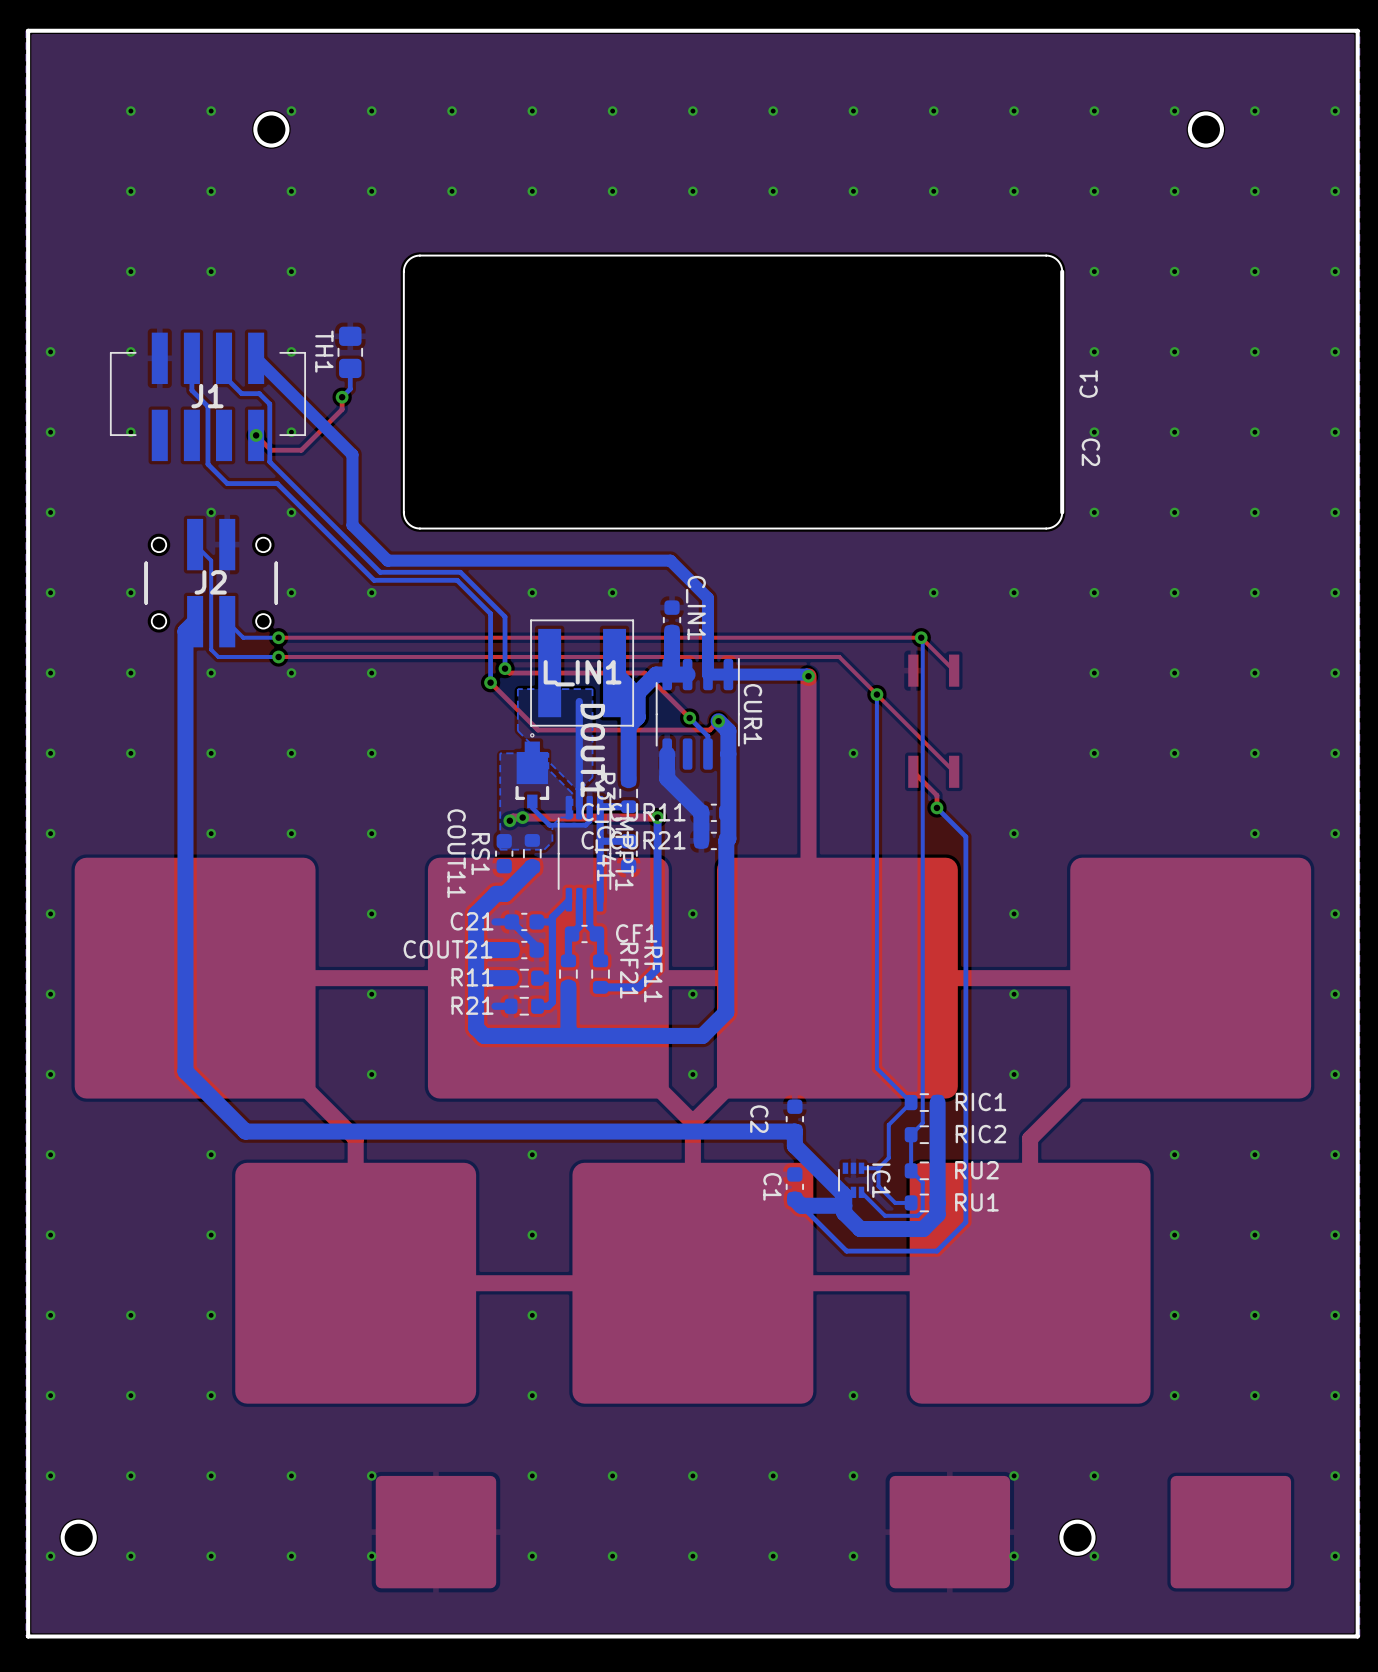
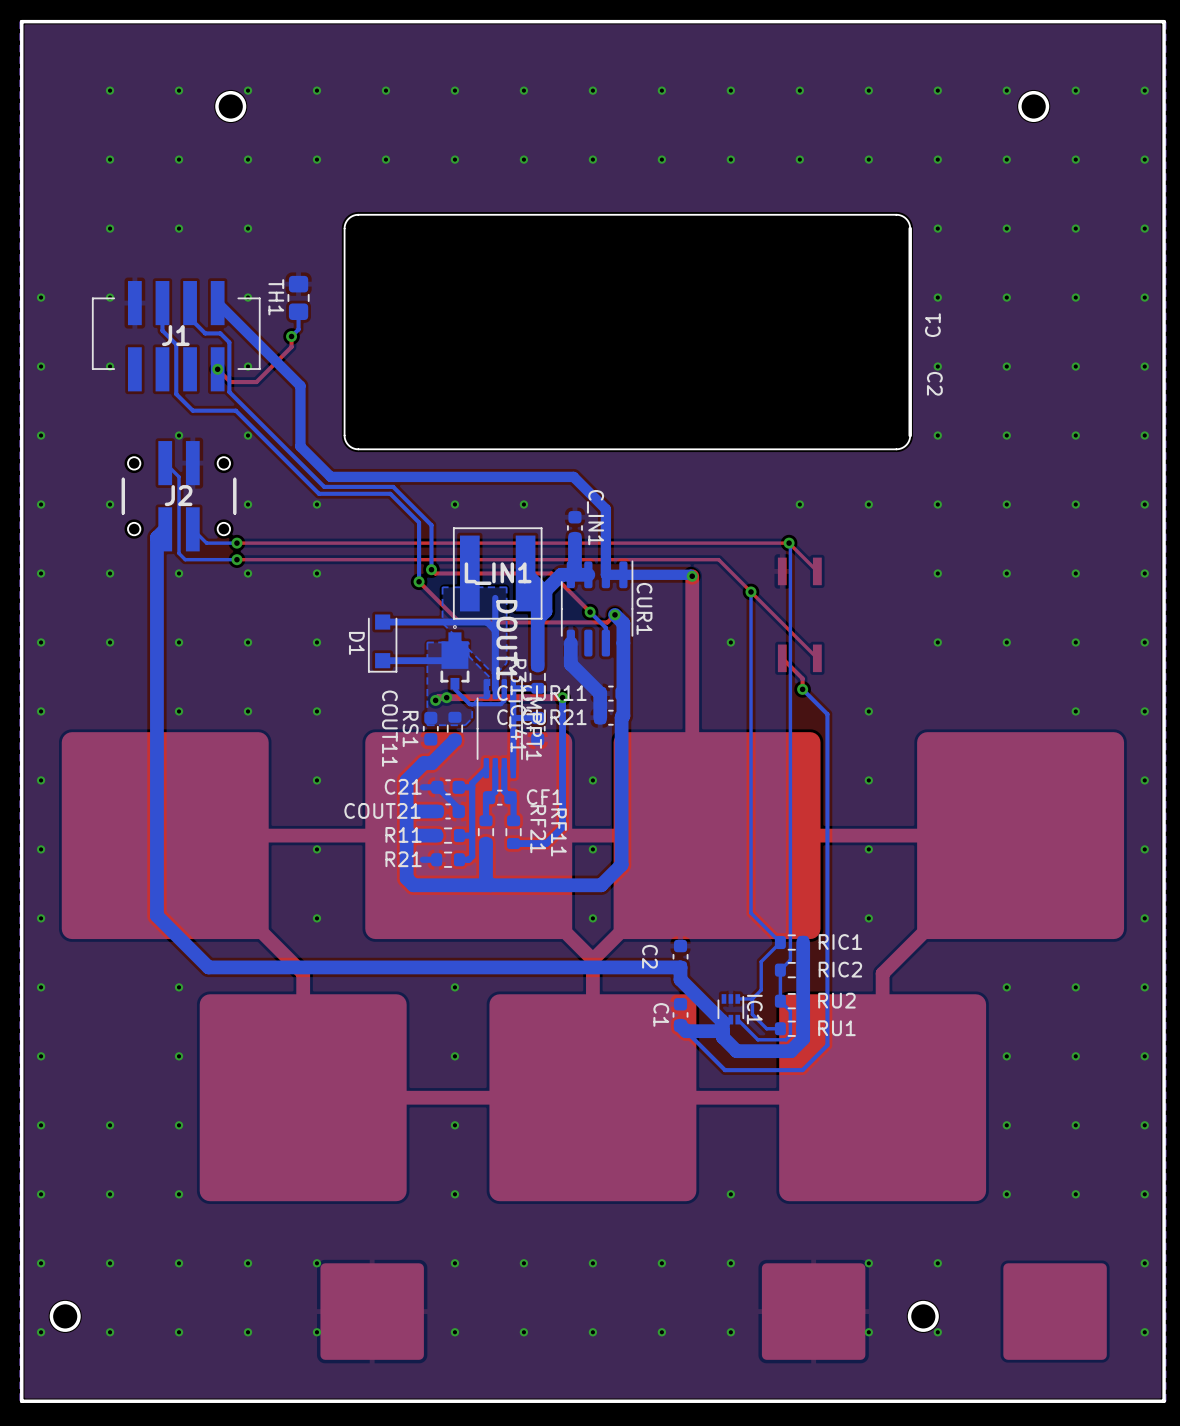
bottom track: none -> (382, 622) (487, 622) (495, 630) (495, 689)
D1: none -> (382, 643)
bottom track: none -> (454, 655) (449, 660) (382, 660)

